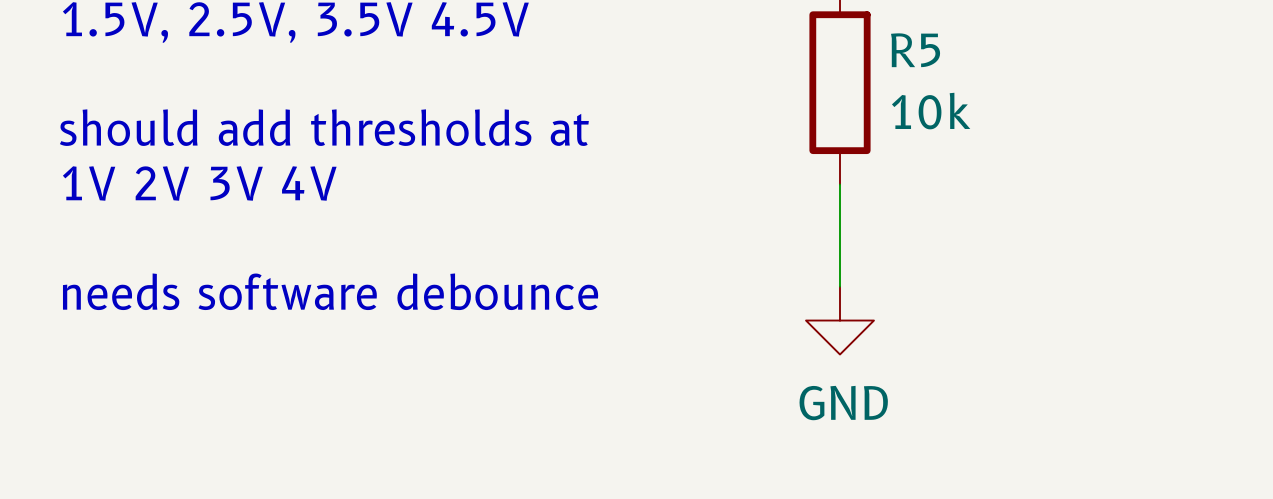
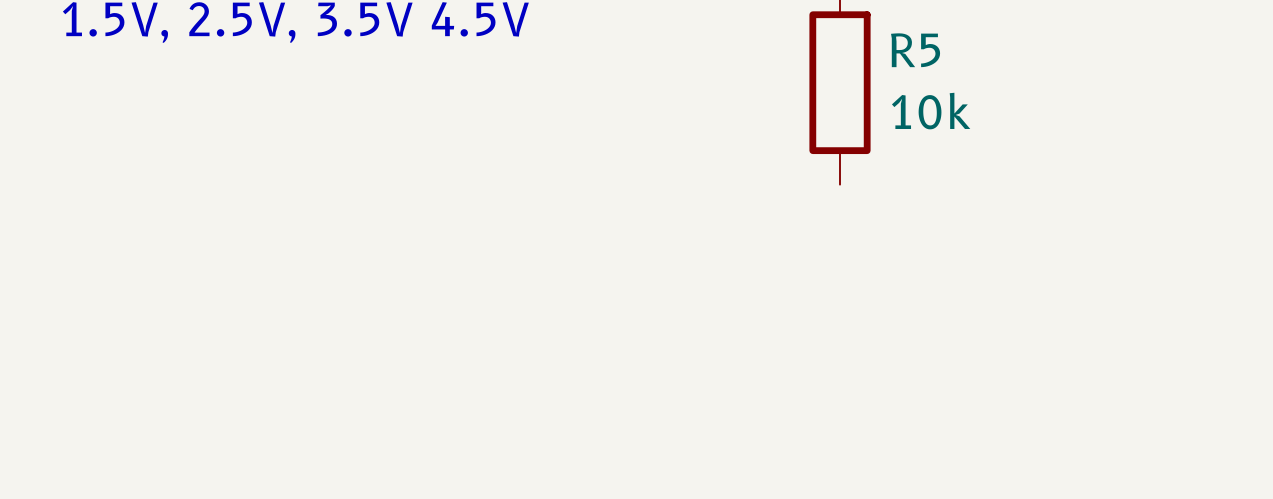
text: should add thresholds at (324, 127) -> none
text: 1V 2V 3V 4V (199, 183) -> none
wire: (839, 184) (839, 286) -> none
text: needs software debounce (330, 291) -> none
power symbol: GND (839, 320) -> none

